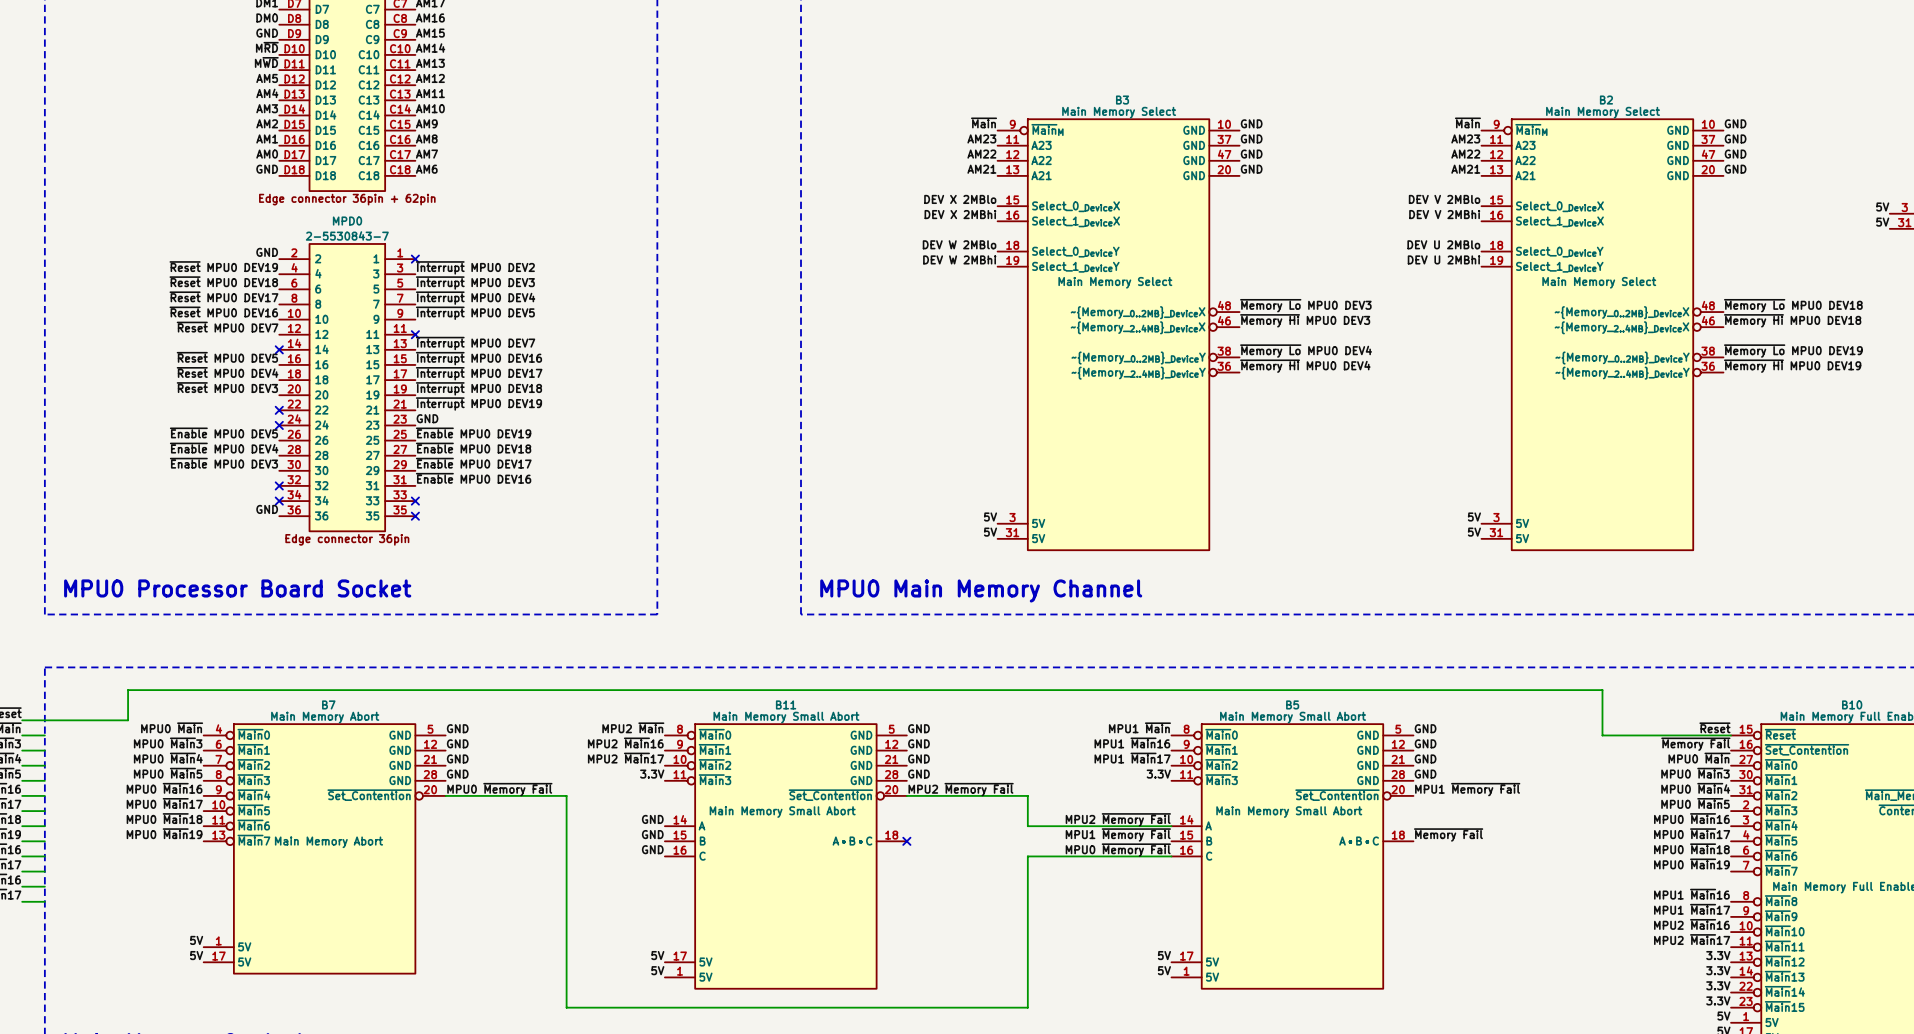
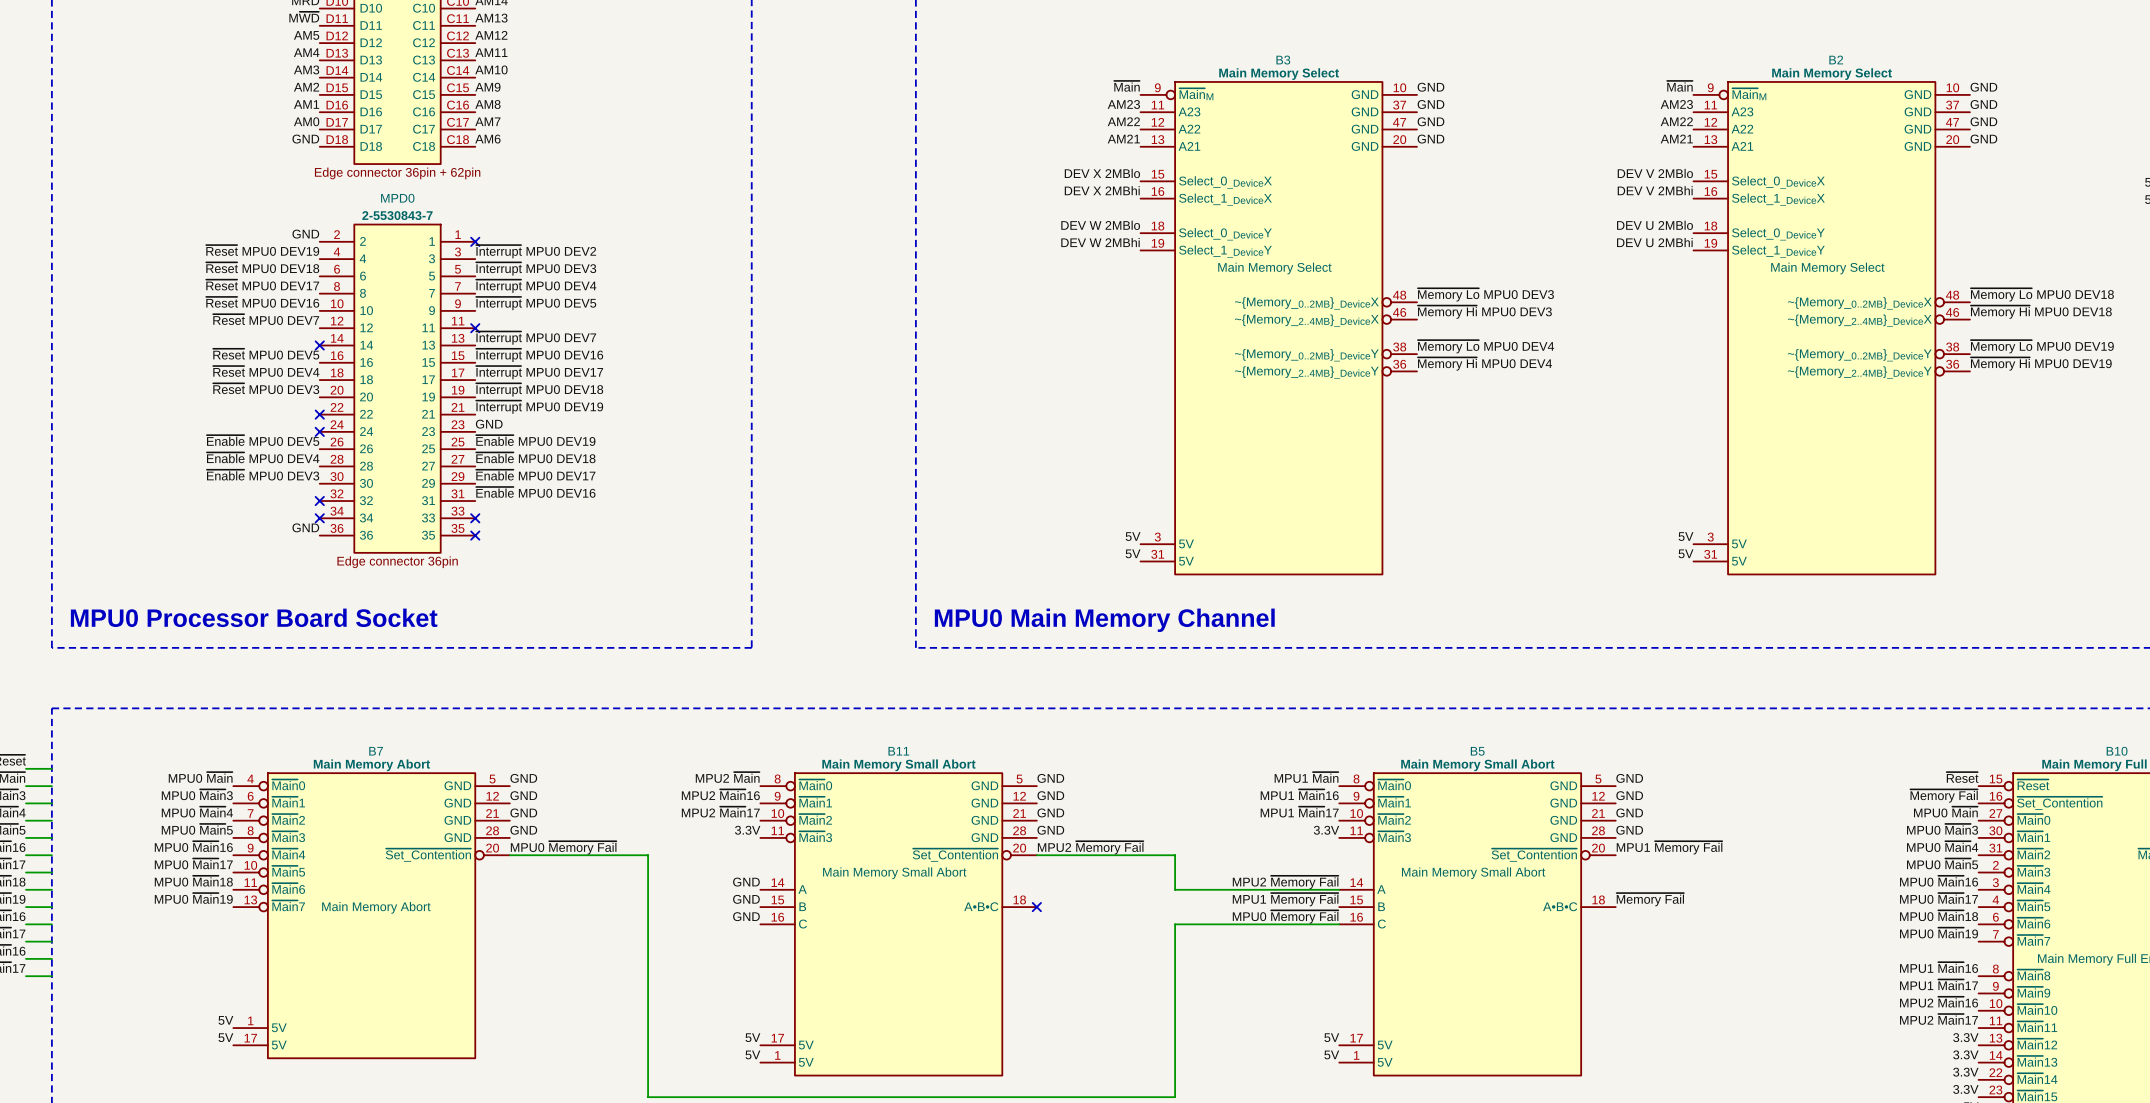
wire: (44, 720) (128, 720) (128, 690) (1602, 690) (1602, 735) (1731, 735) -> none

